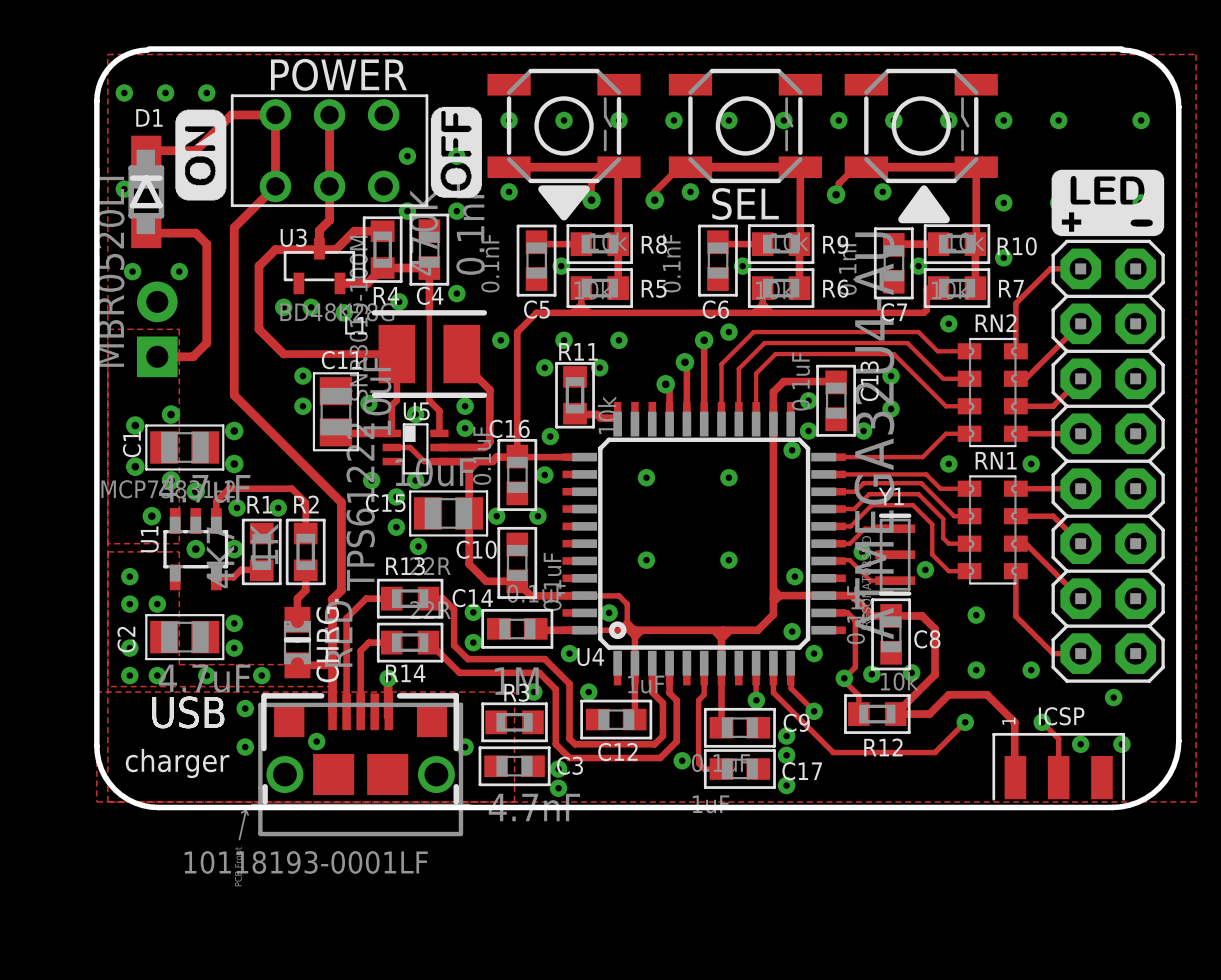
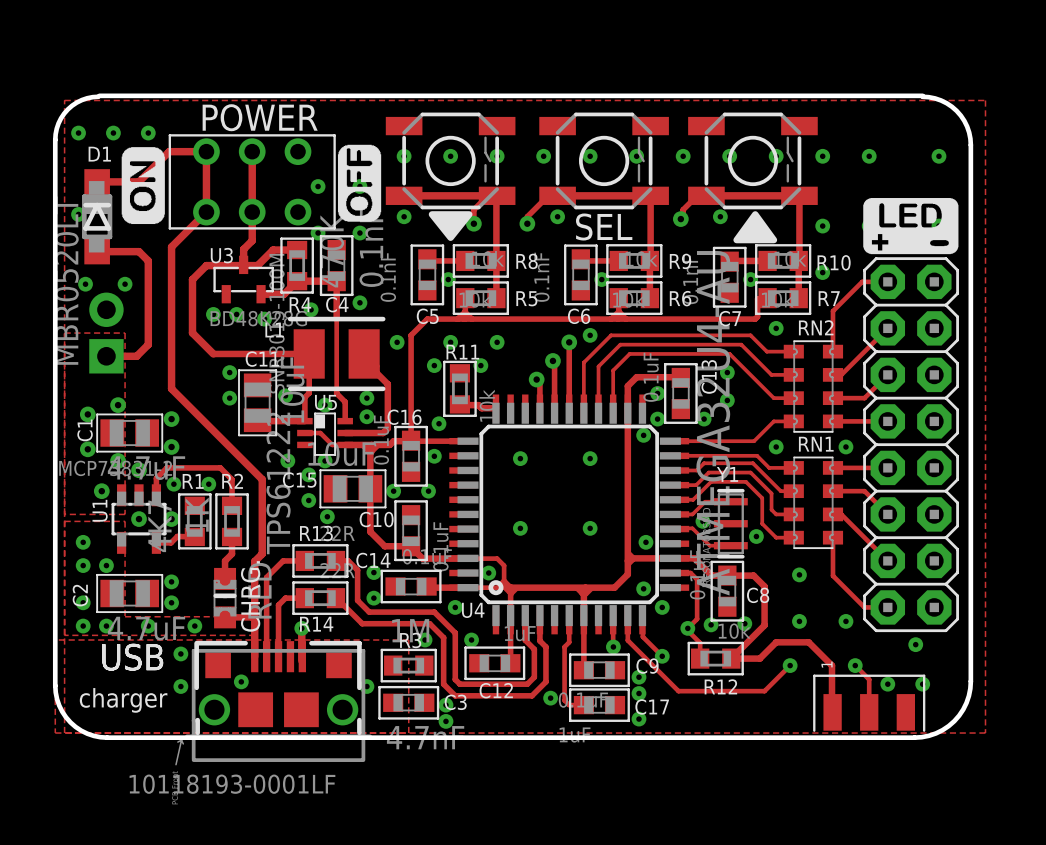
text: ICSP (1061, 716) -> none

